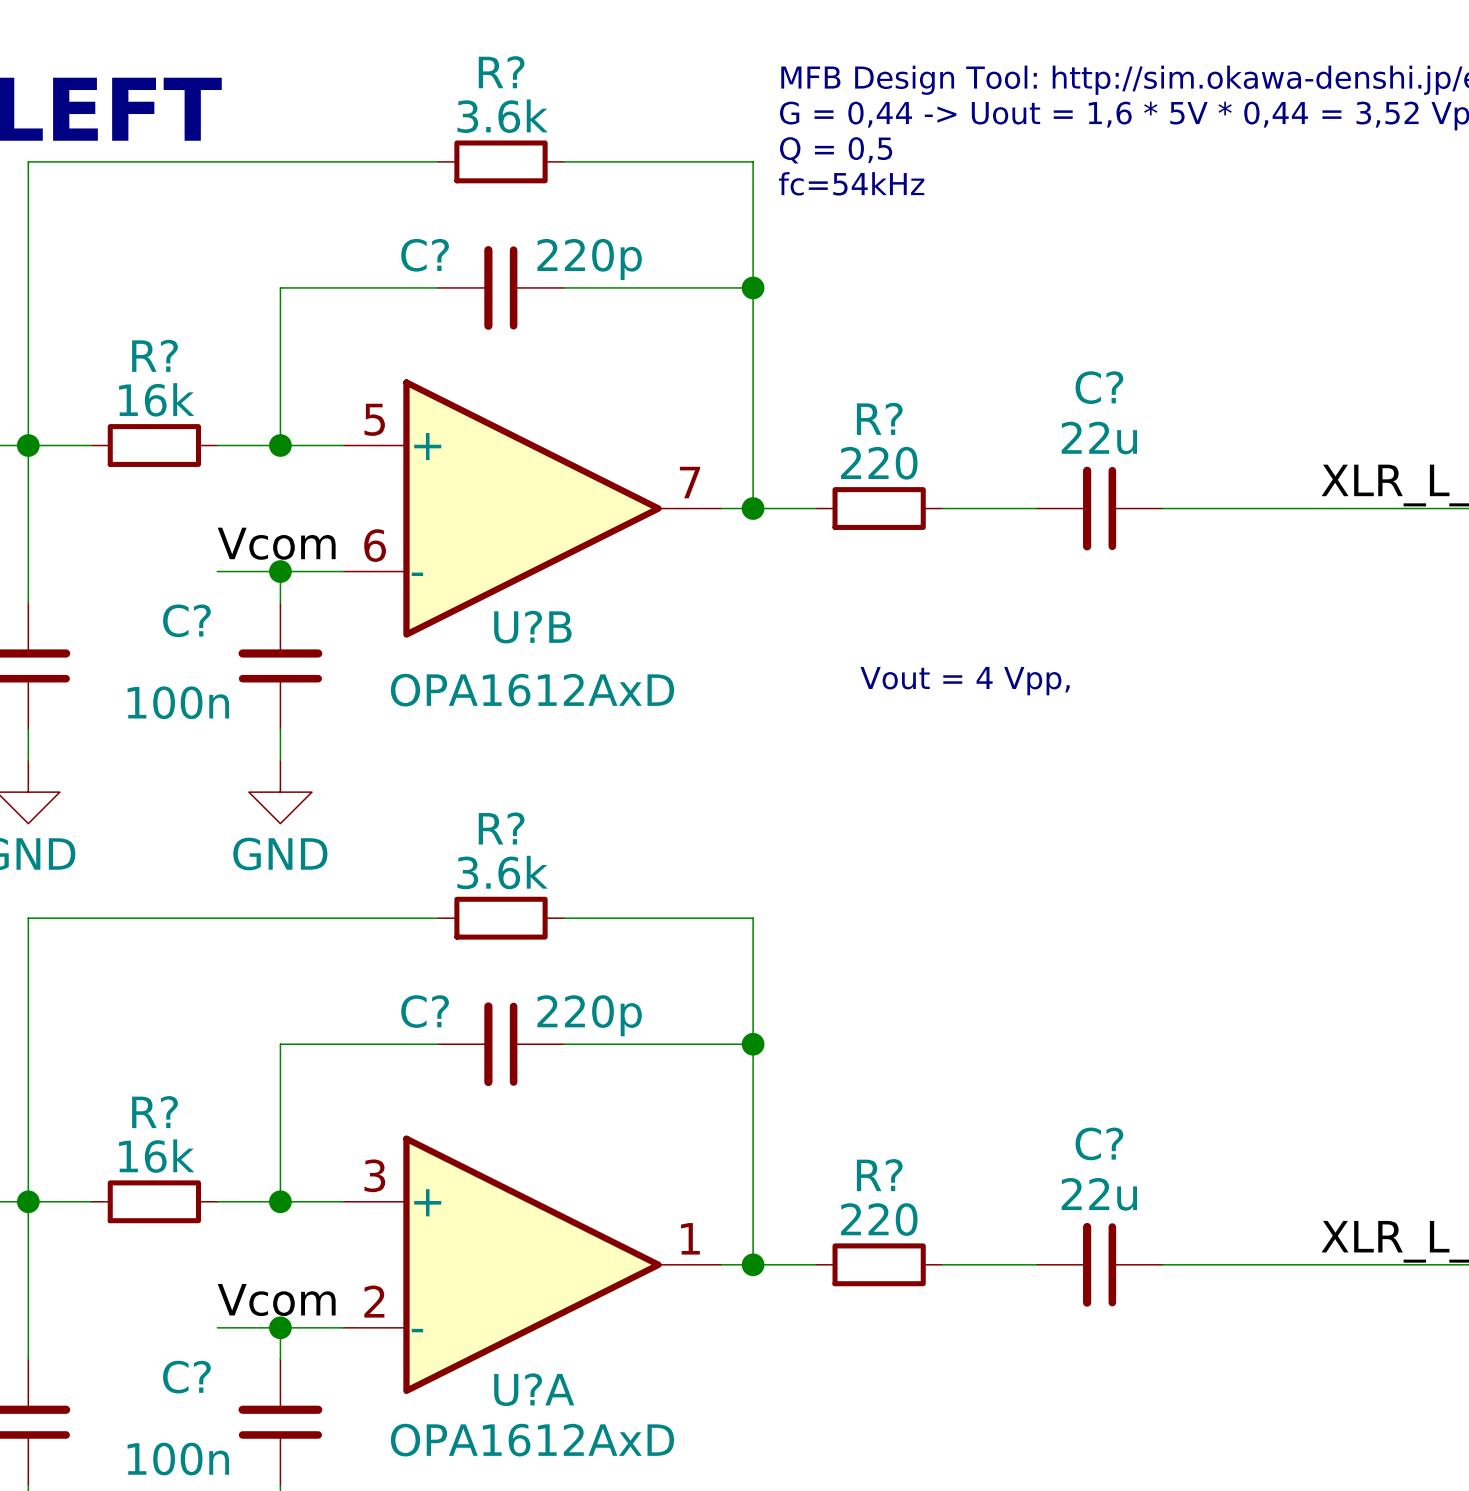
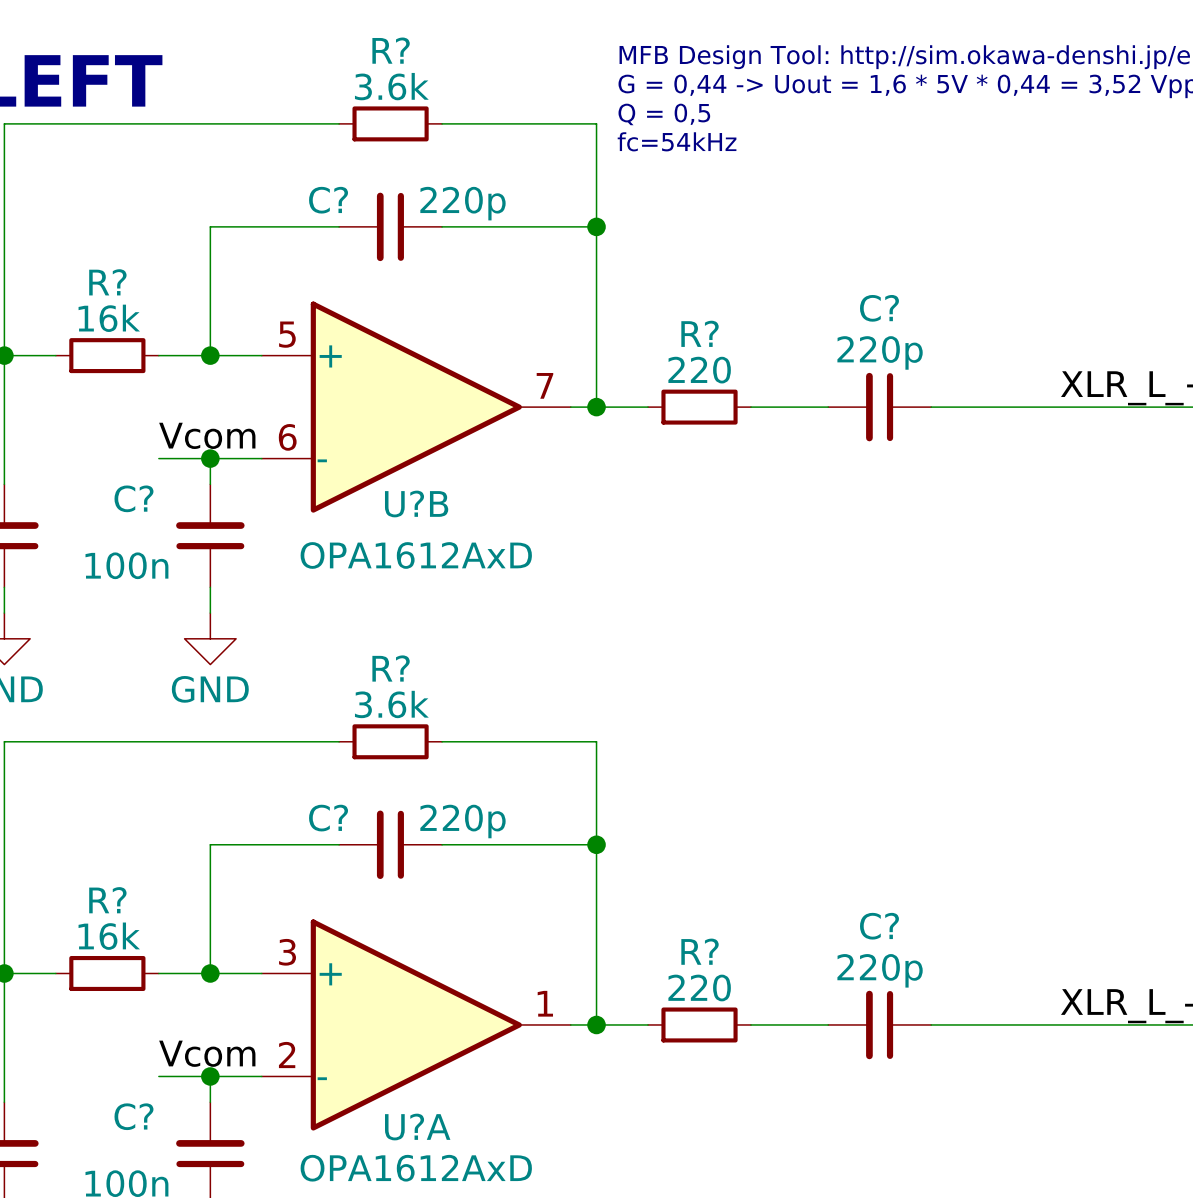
C? value: 22u (1099, 438) -> 220p (880, 352)
text: Vout = 4 Vpp, (965, 681) -> none
C? value: 22u (1099, 1194) -> 220p (880, 970)

